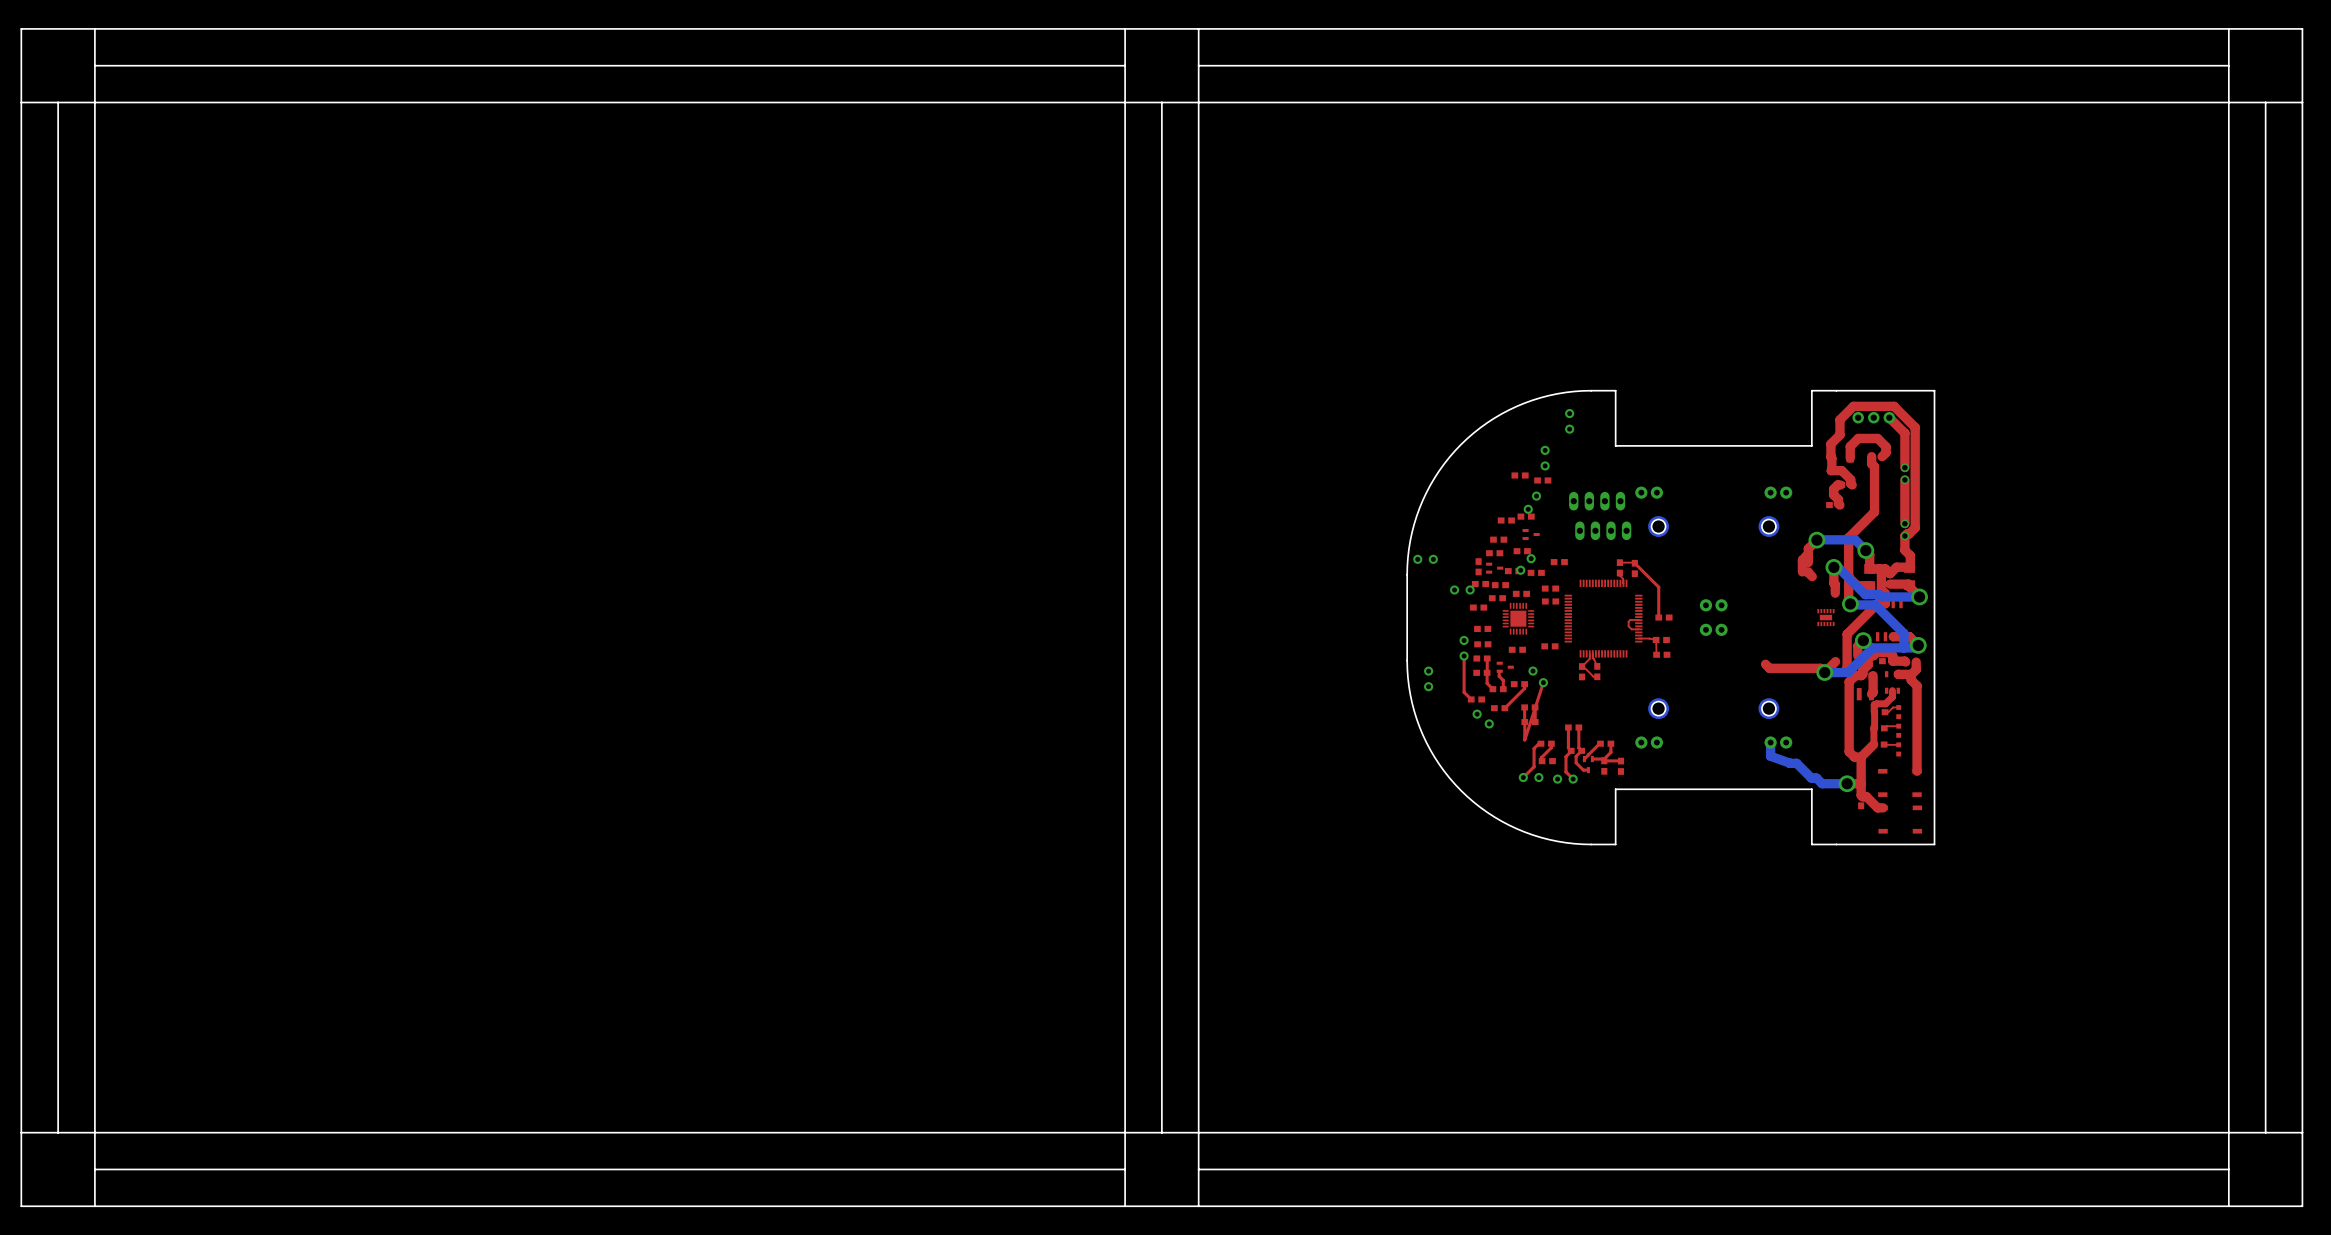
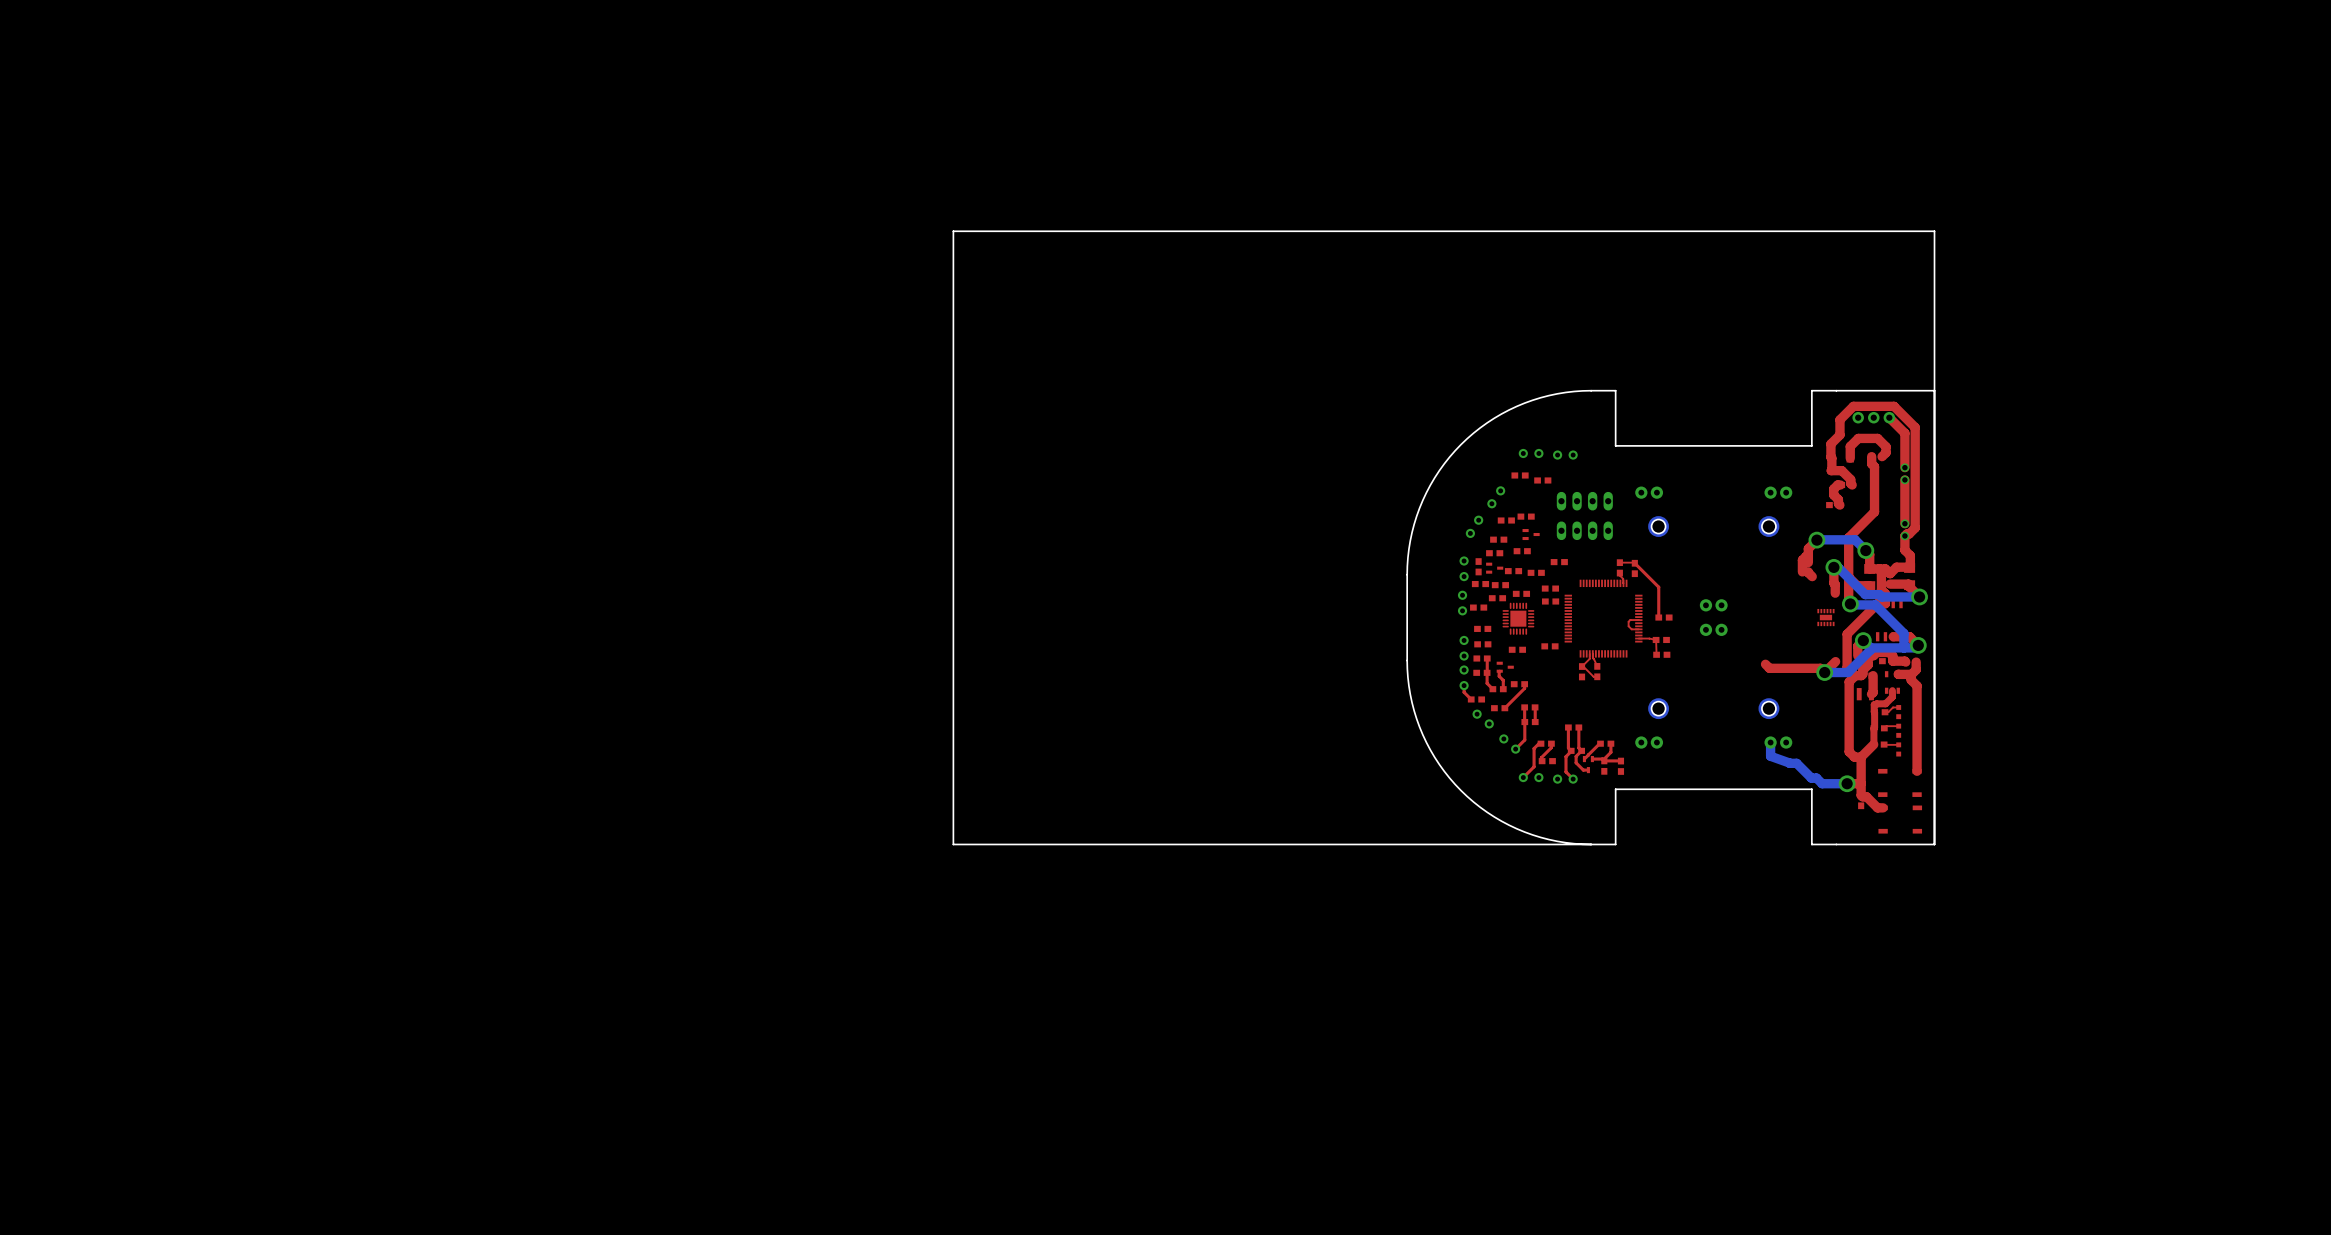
board edge: (94, 28) (94, 1206) -> none
board edge: (1125, 28) (1125, 1206) -> none
board edge: (1198, 28) (1198, 1206) -> none
board edge: (2228, 28) (2228, 1206) -> none
board edge: (2302, 28) (2302, 1206) (21, 1206) (21, 28) (2302, 28) -> none
board edge: (1125, 65) (94, 65) -> none
board edge: (2228, 65) (1198, 65) -> none
board edge: (58, 102) (58, 1132) -> none
board edge: (1161, 102) (1161, 1132) -> none
board edge: (2265, 102) (2265, 1132) -> none
board edge: (2302, 102) (21, 102) -> none
part: (1569, 421) -> none
part: none -> (1531, 453)
part: none -> (1565, 455)
part: (1545, 458) -> none
part: none -> (1496, 497)
part position: (1597, 501) -> (1584, 501)
part position: (1532, 502) -> (1474, 526)
part: none -> (1584, 530)
part: (1603, 530) -> none
part: (1425, 559) -> none
part: (1525, 564) -> none
part: none -> (1464, 568)
part: (1462, 589) -> none
part: none -> (1462, 603)
top track: (1464, 656) (1464, 685) -> none
part: (1538, 676) -> none
part position: (1428, 678) -> (1464, 677)
top track: (1543, 682) (1524, 739) -> (1515, 749) (1524, 739)
part: none -> (1509, 744)
board edge: none -> (1934, 844) (1934, 231) (953, 231) (953, 844) (1591, 844)
board edge: (2302, 1132) (21, 1132) -> none
board edge: (1125, 1169) (94, 1169) -> none
board edge: (2228, 1169) (1198, 1169) -> none

